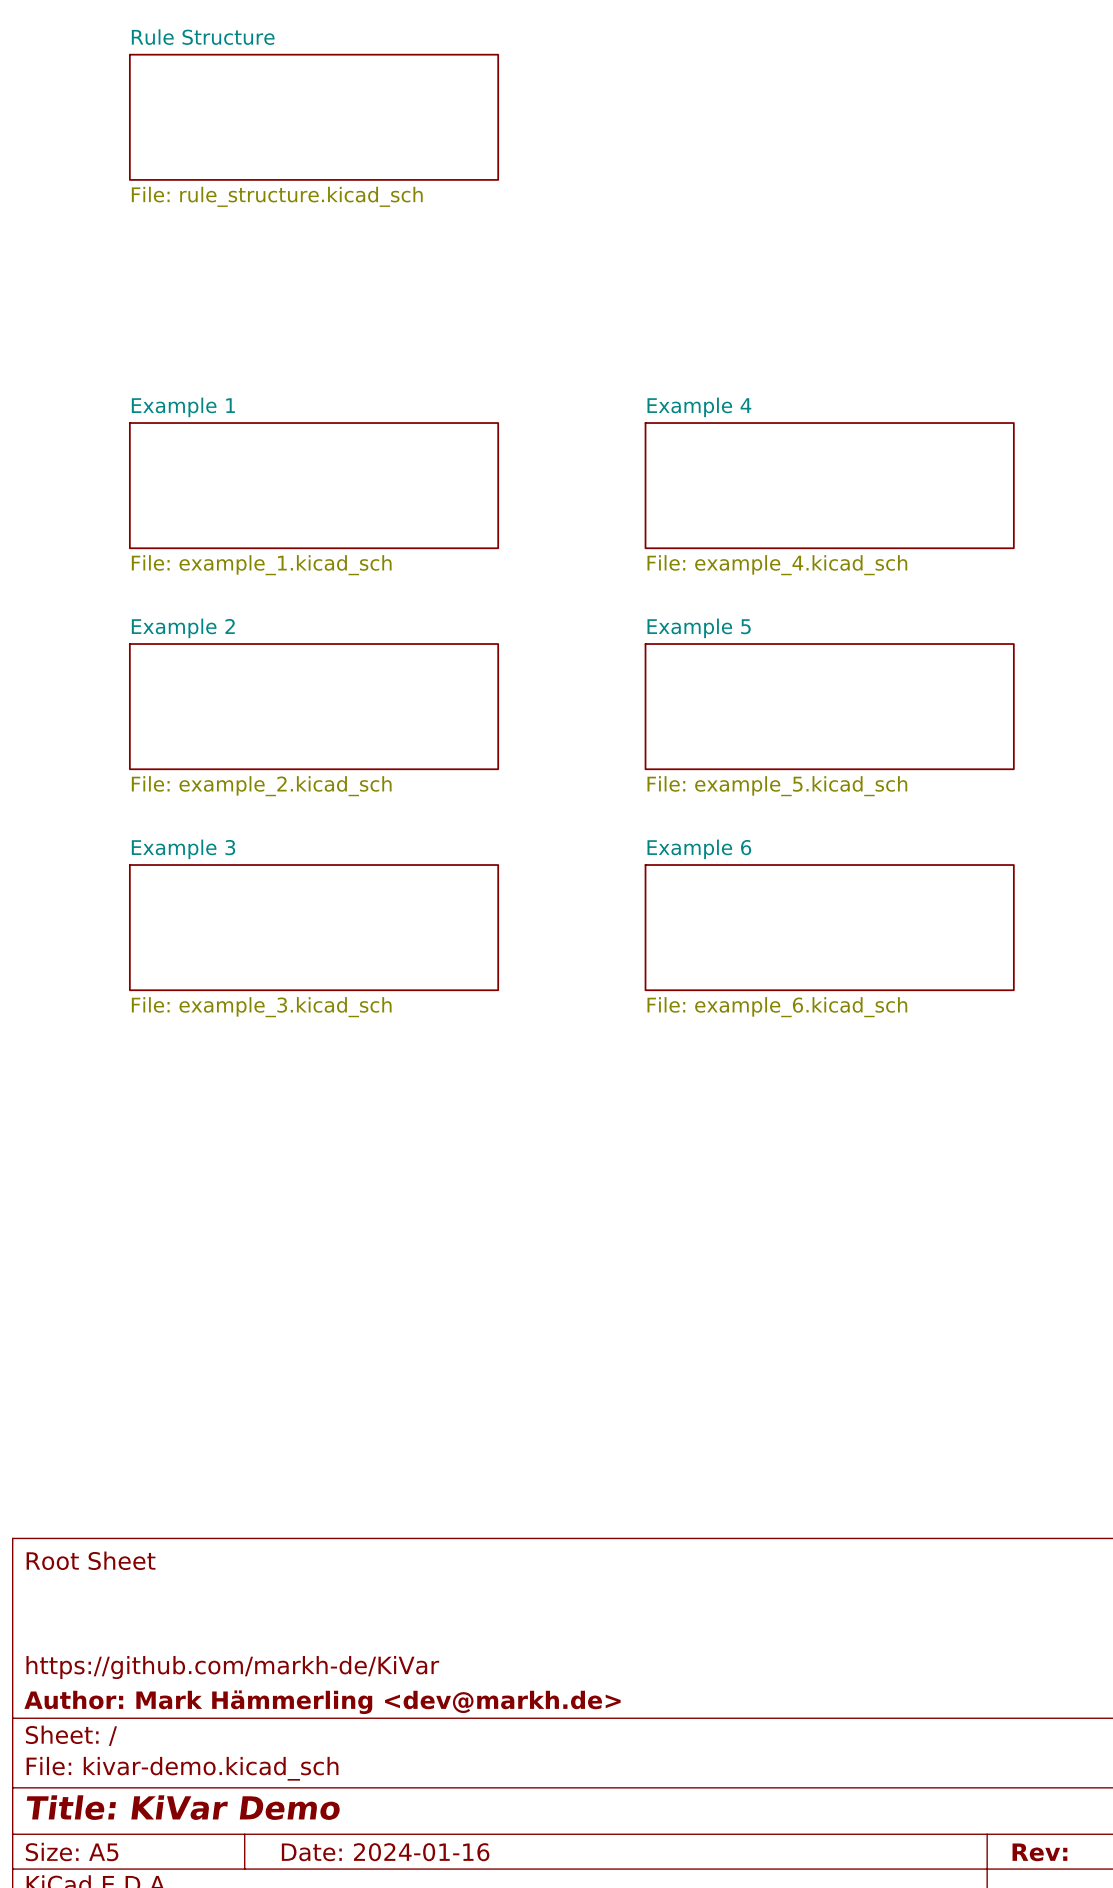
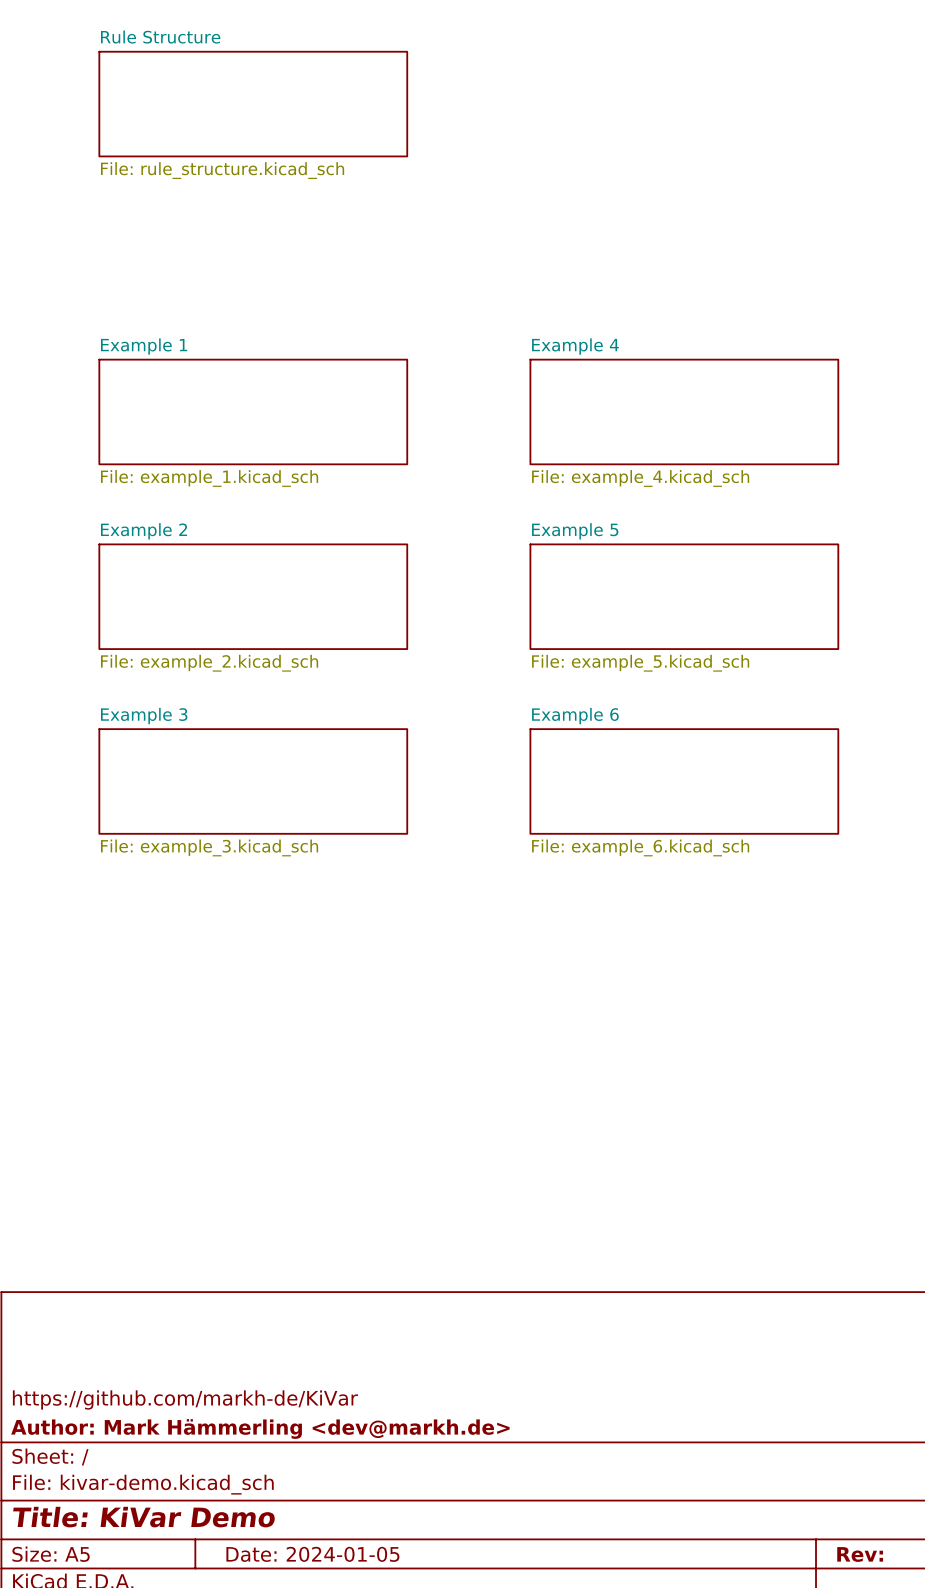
title block: Root Sheet (91, 1560) -> none
title block: Date: 2024-01-16 (385, 1852) -> Date: 2024-01-05 (312, 1554)

